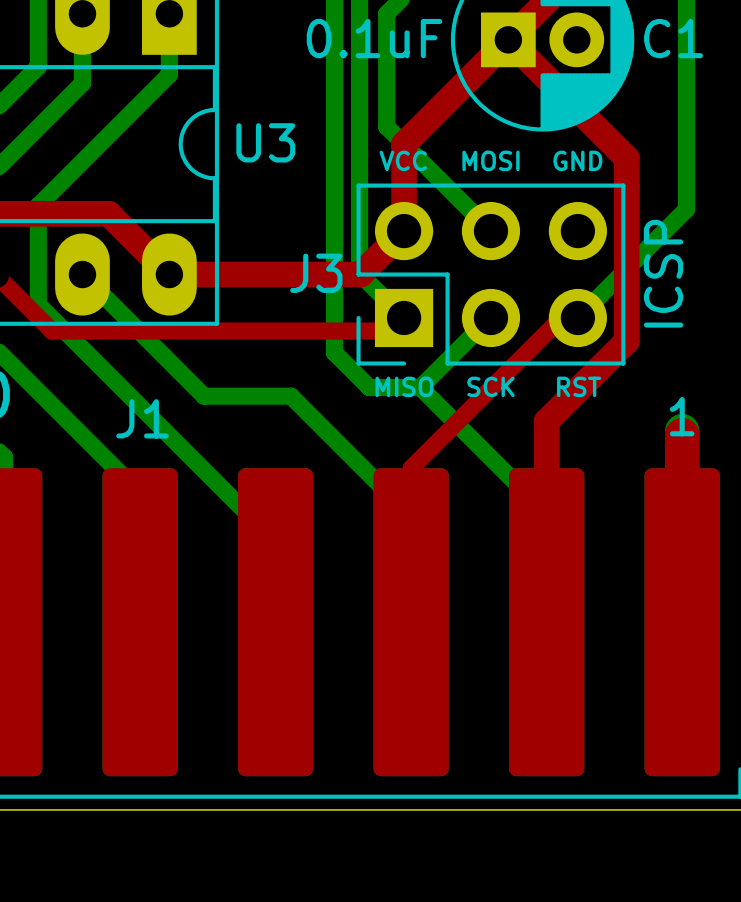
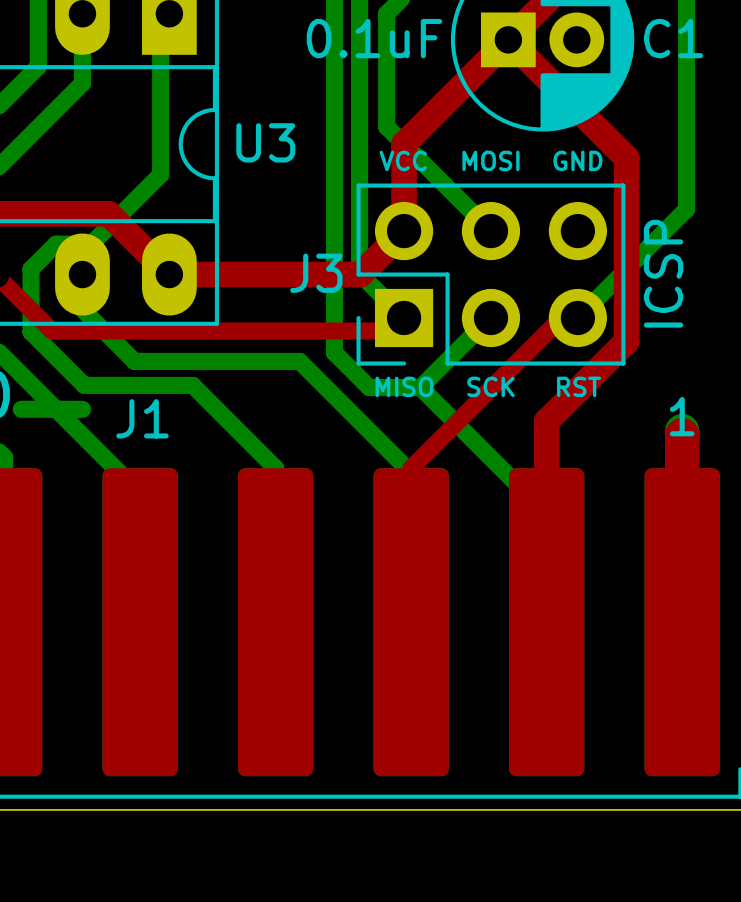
bottom track: (169, 13) (169, 74) (38, 205) (38, 304) (275, 541) -> (160, 39) (160, 174) (91, 244) (56, 244) (31, 269) (31, 332) (84, 385) (192, 385) (275, 468) (275, 541)
bottom track: (82, 274) (204, 396) (291, 396) (411, 516) -> (73, 300) (134, 361) (299, 361) (411, 472) (411, 516)
bottom track: none -> (21, 409) (82, 409)

